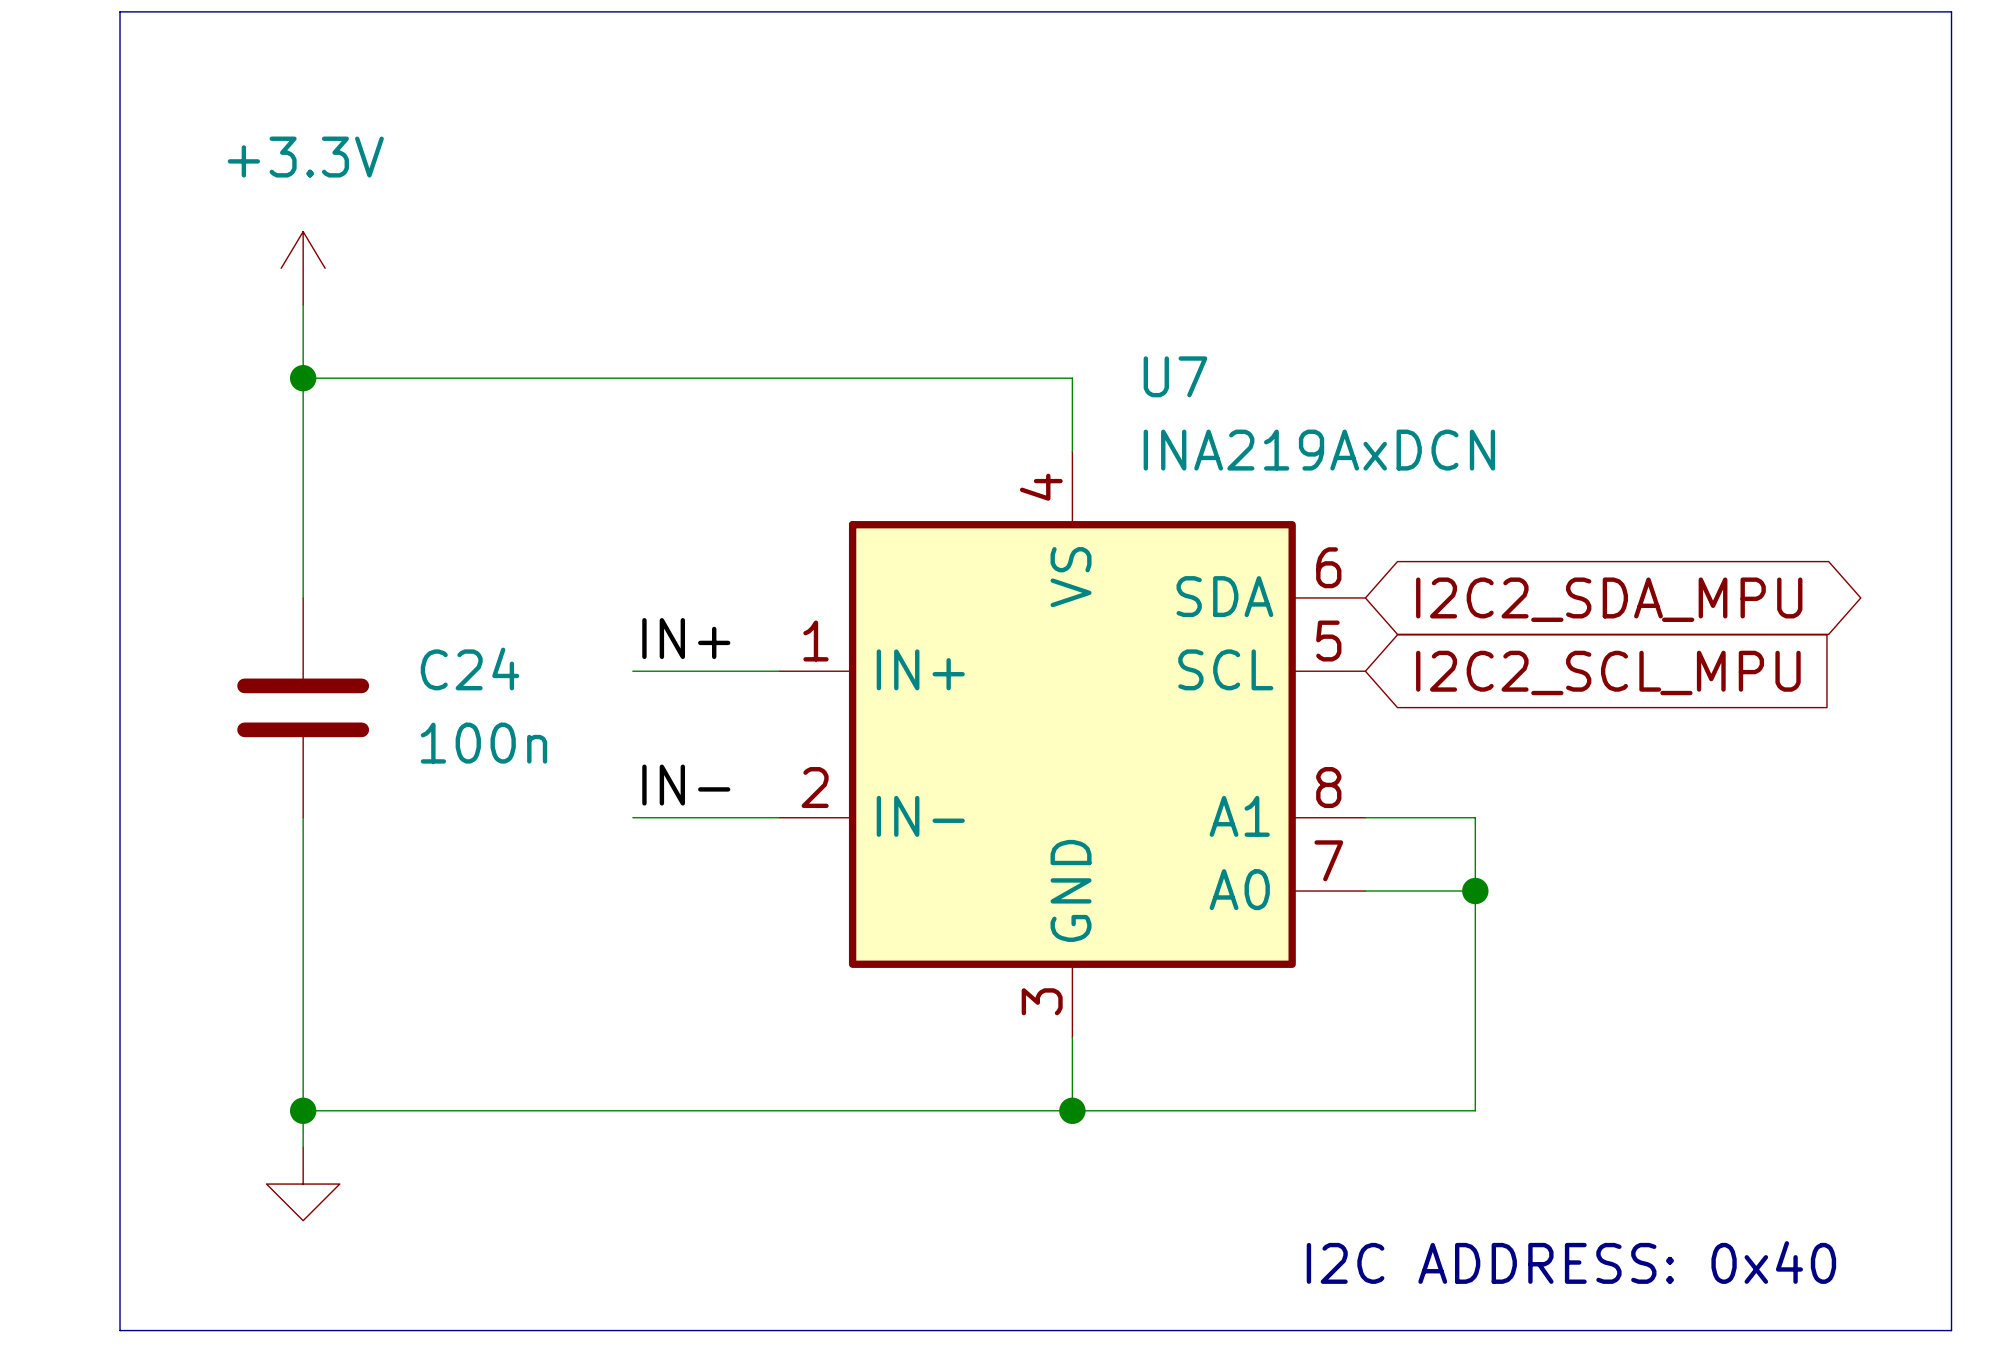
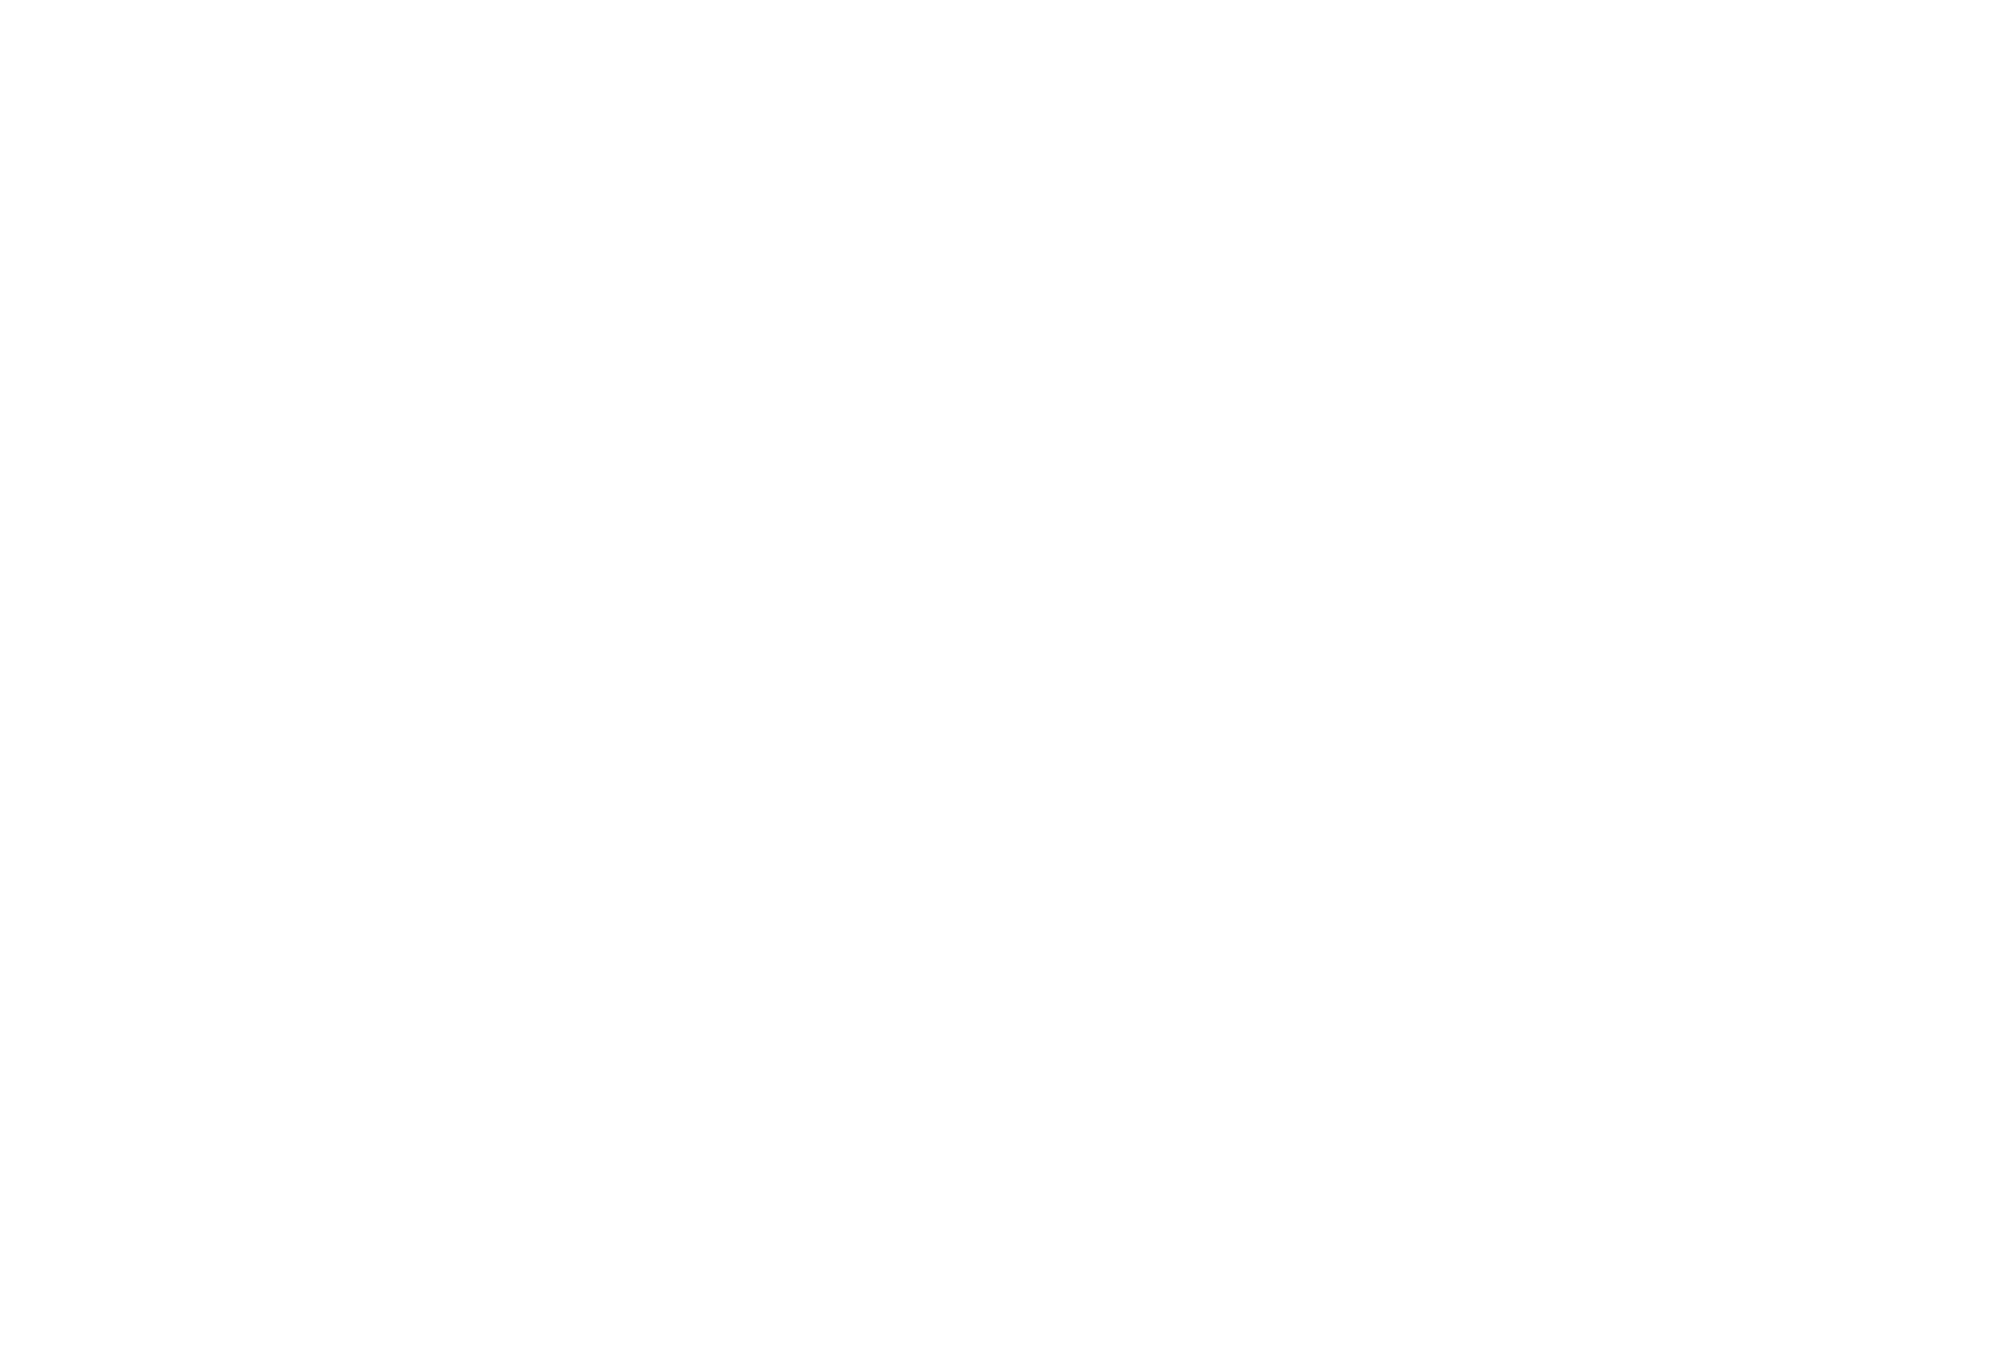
line: (120, 11) (1951, 11) (1951, 1330) (120, 1330) (120, 11) -> none
power symbol: +3.3V (303, 268) -> none
wire: (303, 304) (303, 597) -> none
wire: (303, 378) (1072, 378) (1072, 451) -> none
junction: (303, 378) -> none
global label: I2C2_SDA_MPU (1609, 599) -> none
label: IN+ (686, 638) -> none
wire: (632, 671) (779, 671) -> none
global label: I2C2_SCL_MPU (1608, 672) -> none
C24: 100n (303, 707) -> none
U7: INA219AxDCN (1072, 744) -> none
label: IN- (686, 785) -> none
wire: (303, 817) (303, 1147) -> none
wire: (632, 817) (779, 817) -> none
wire: (1365, 817) (1475, 817) (1475, 1110) (303, 1110) -> none
wire: (1365, 891) (1475, 891) -> none
junction: (1475, 891) -> none
wire: (1072, 1037) (1072, 1110) -> none
junction: (303, 1110) -> none
junction: (1072, 1110) -> none
power symbol: (303, 1184) -> none
text: I2C ADDRESS: 0x40 (1571, 1262) -> none

